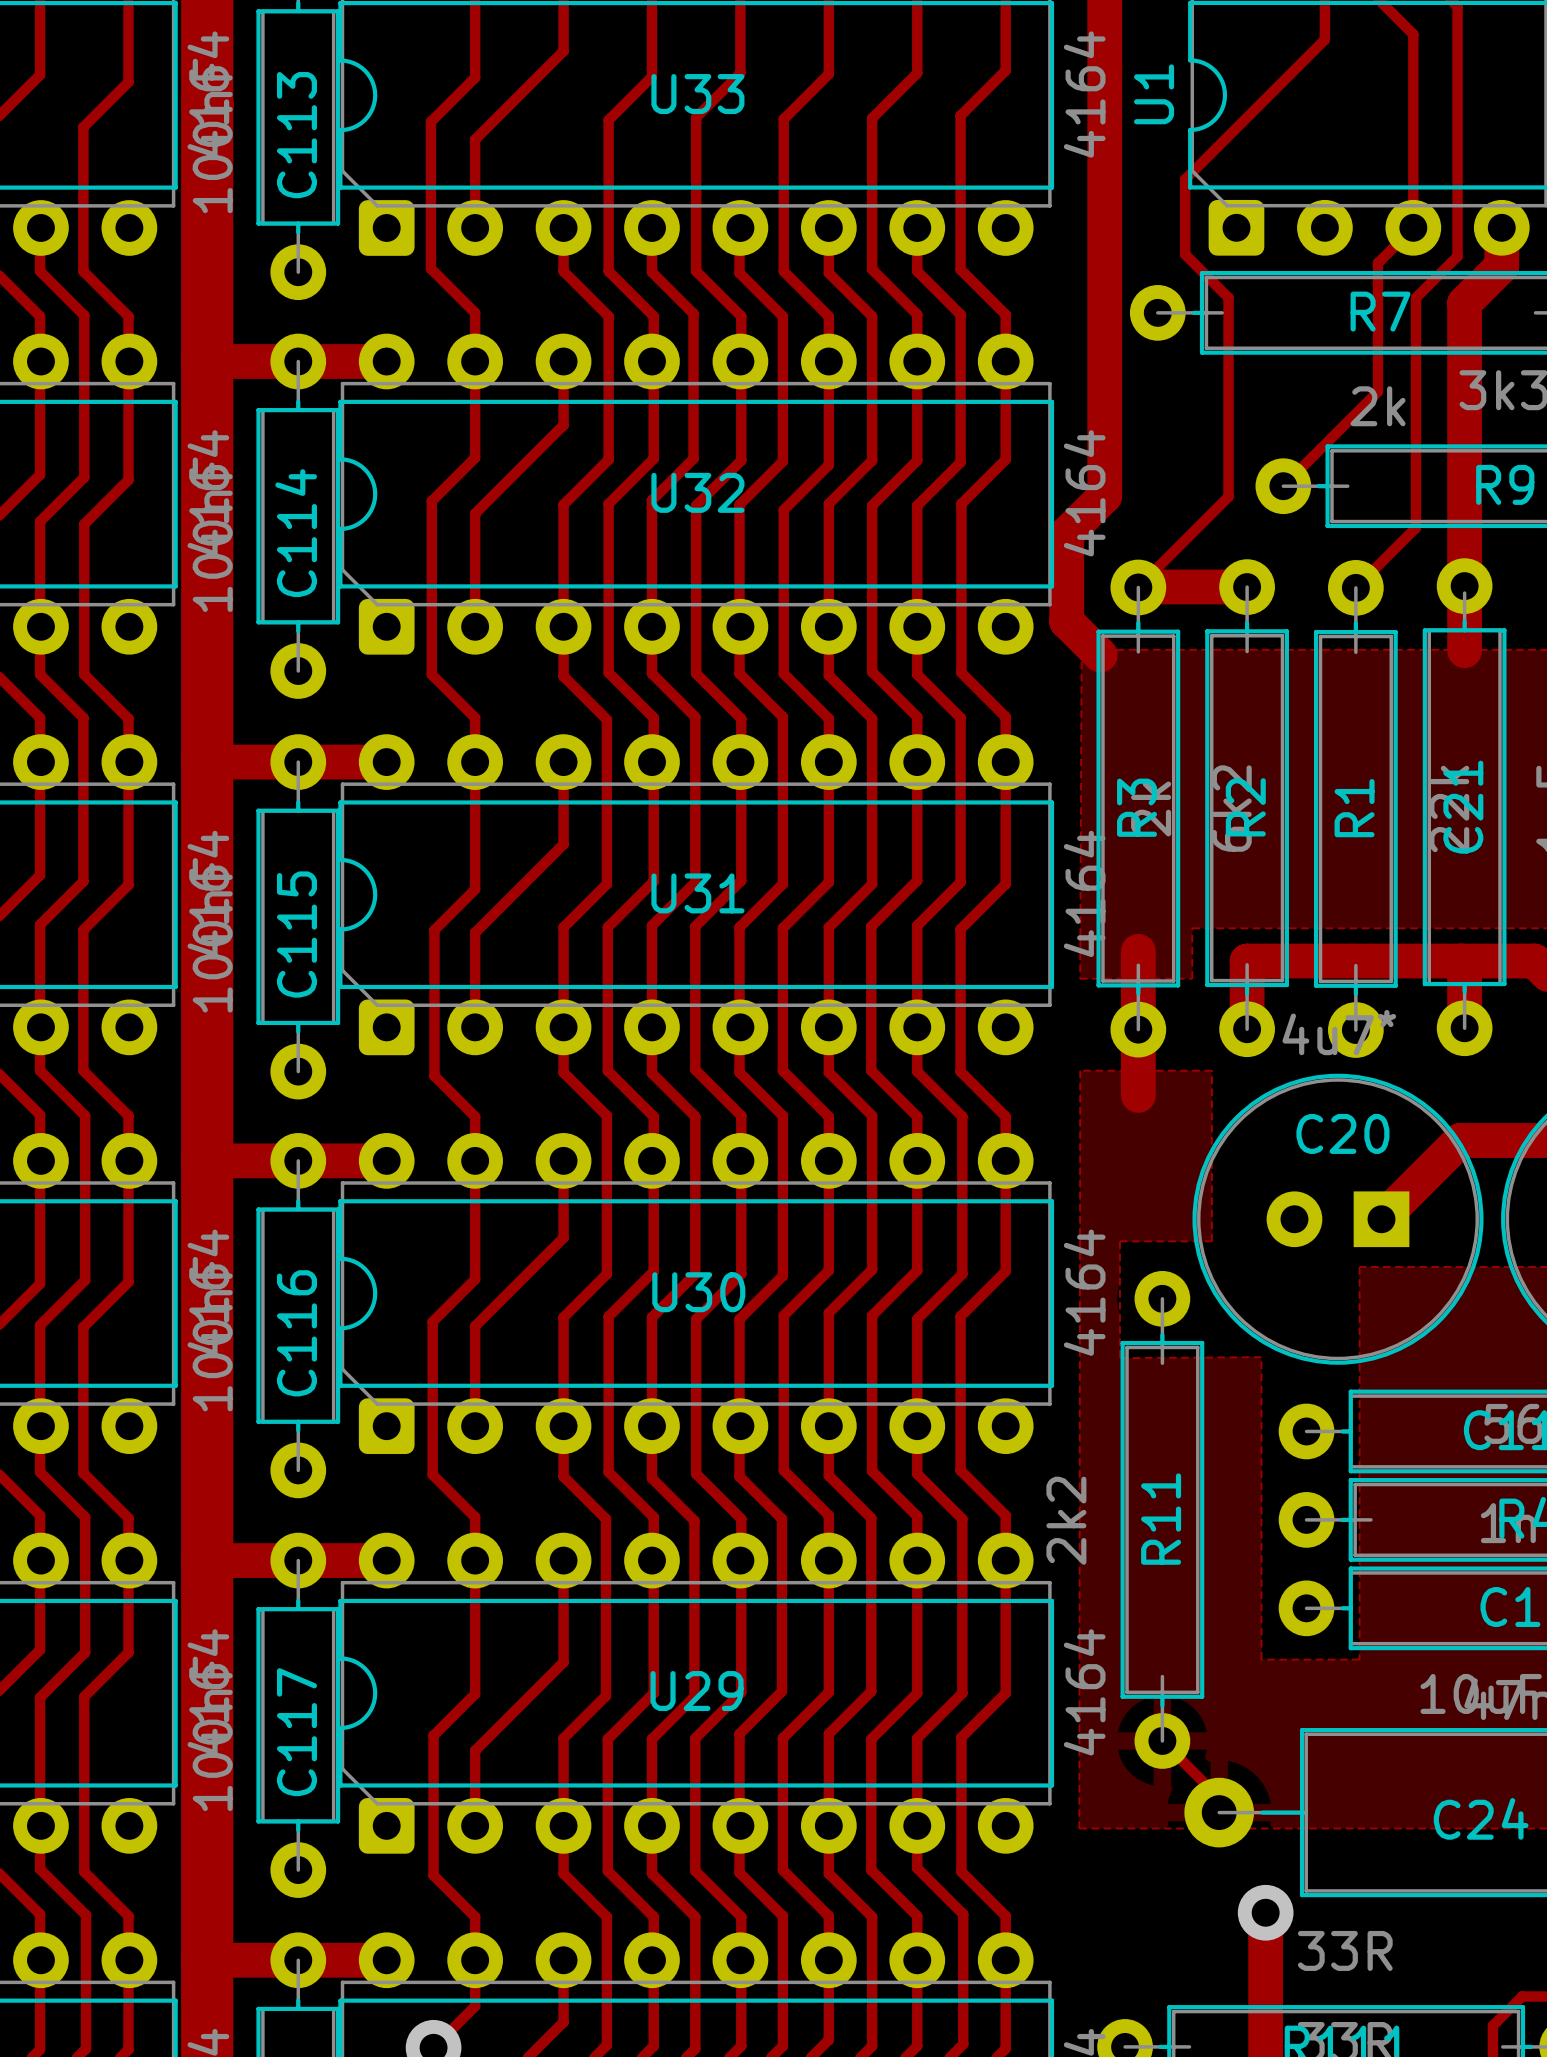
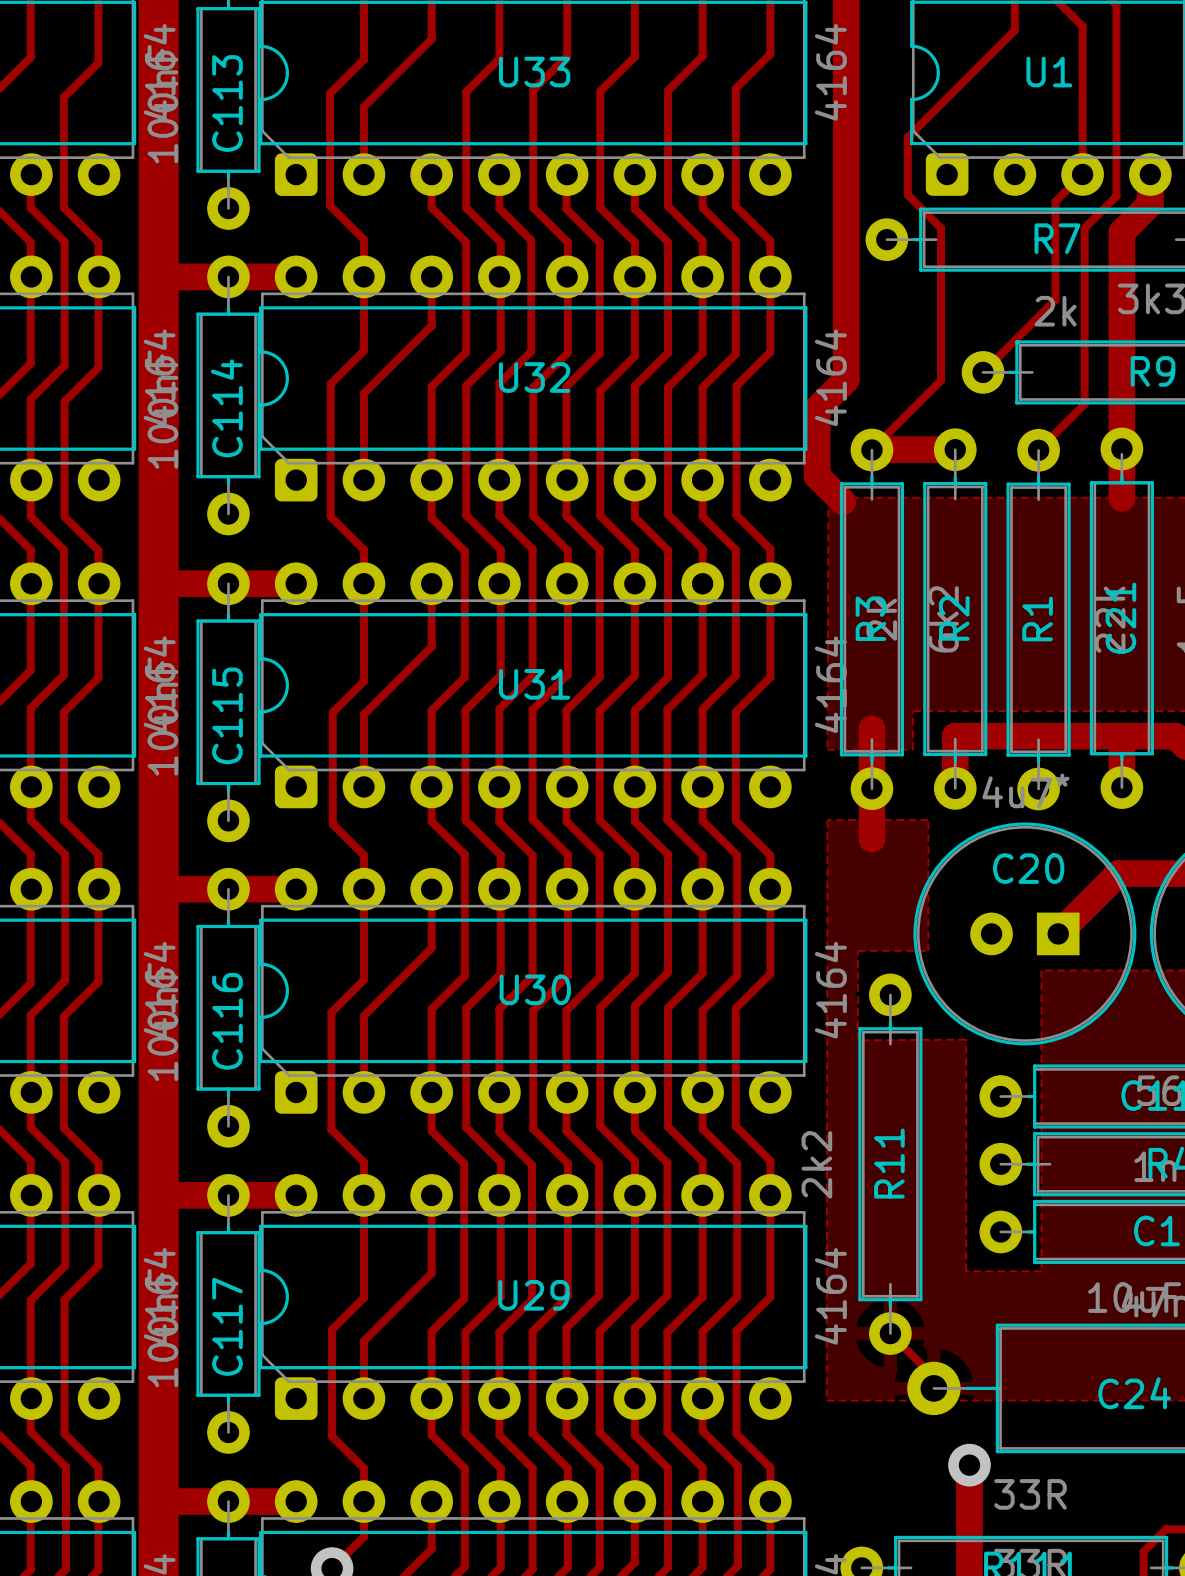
U1 name rotation: 0° (1154, 94) -> 90° clockwise (1049, 72)
U1 name position: U1 (1154, 94) -> U1 (1049, 72)

